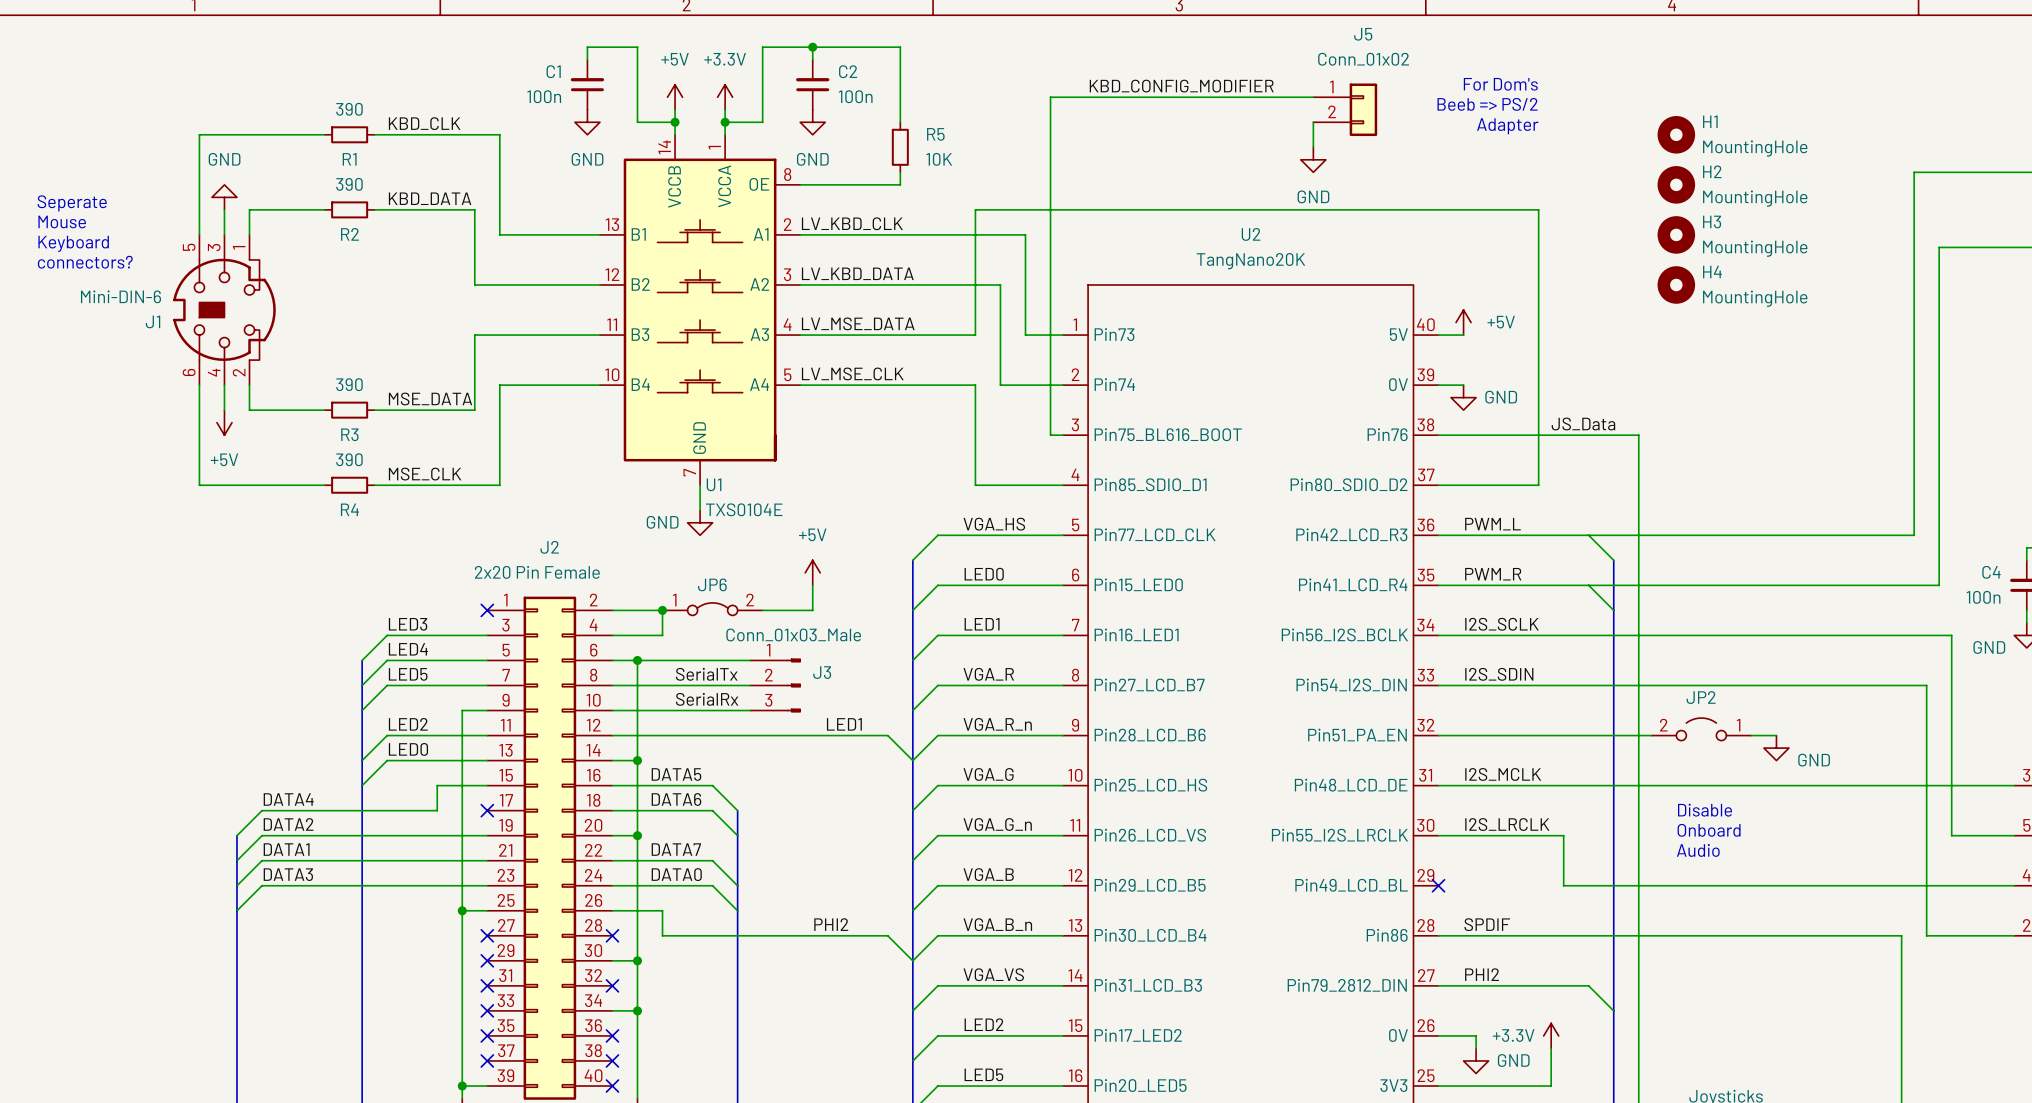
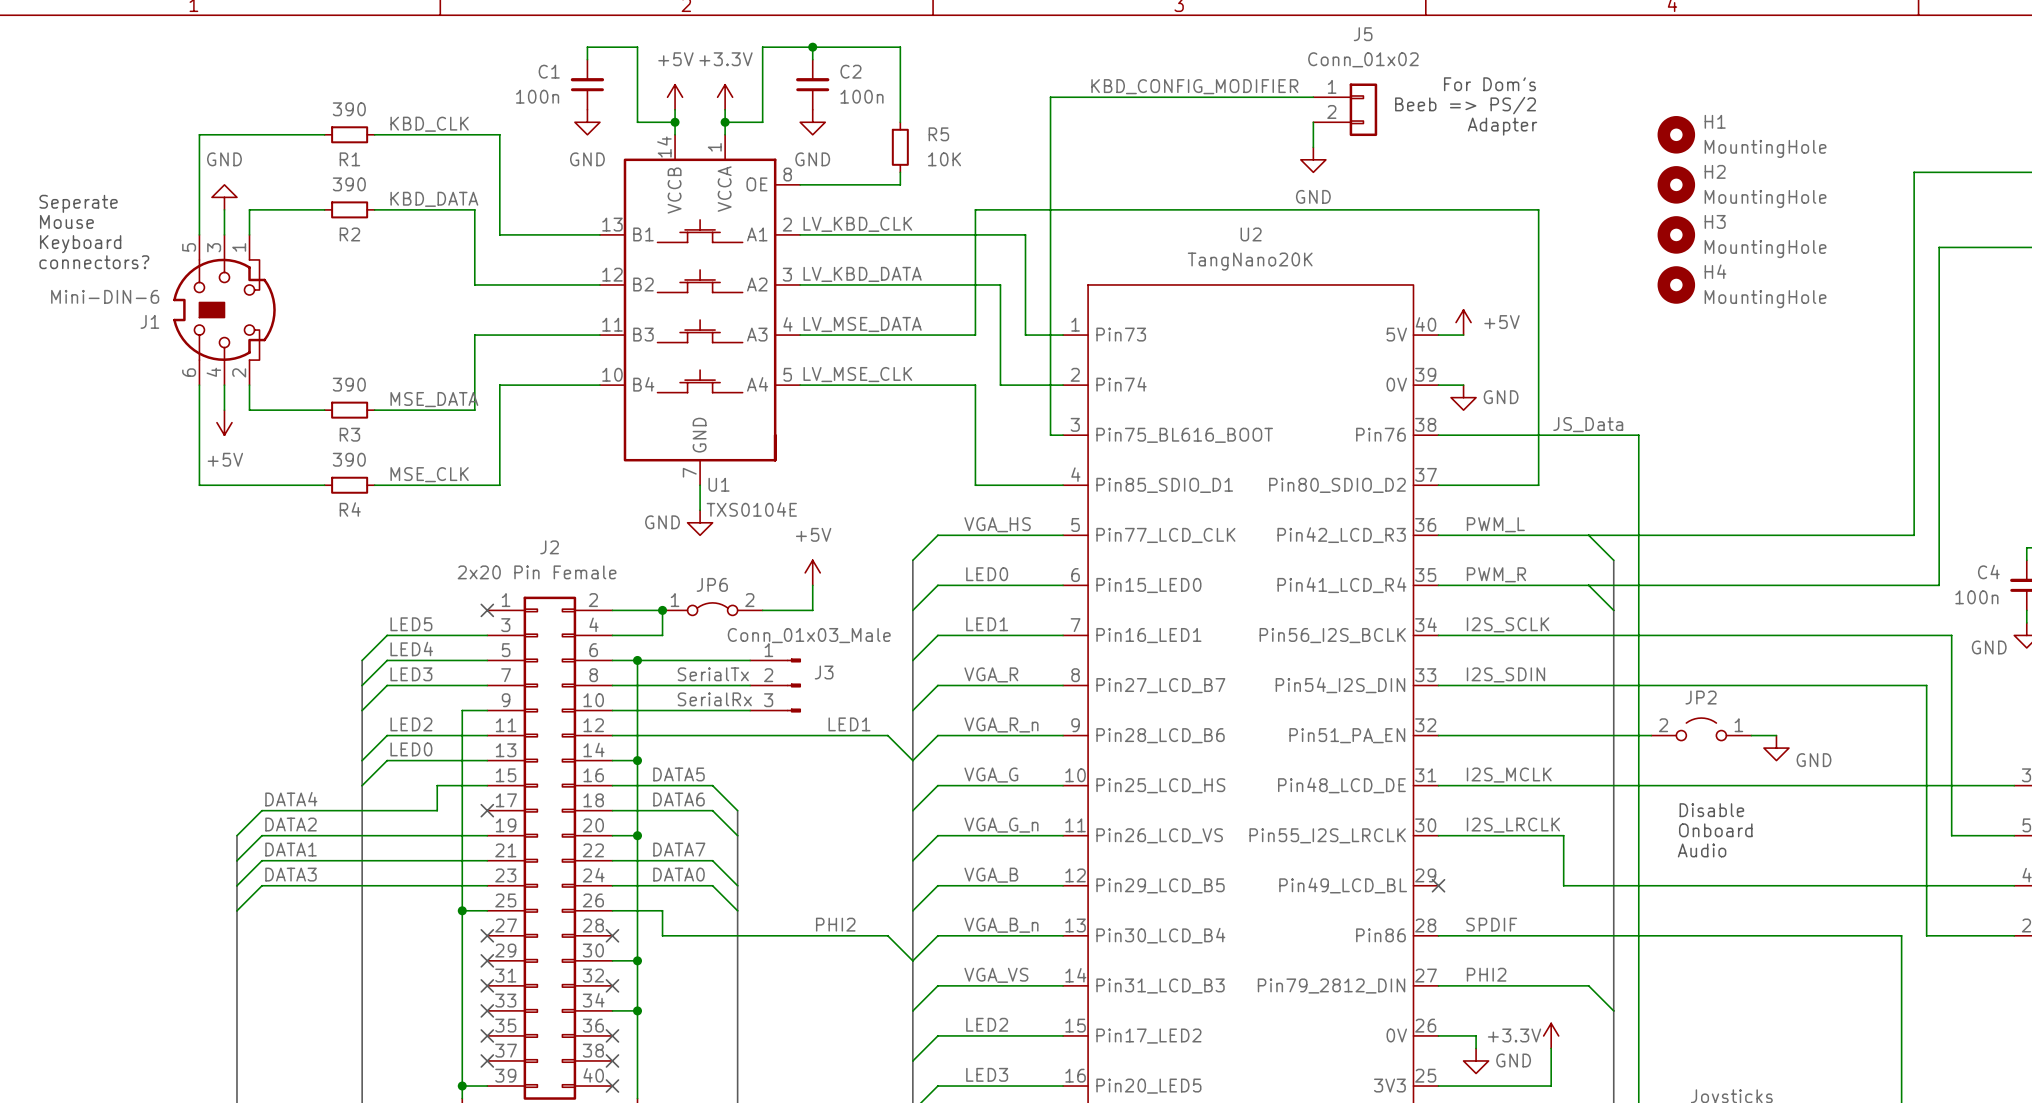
label: LED3 (408, 624) -> LED5 (411, 624)
label: LED5 (408, 674) -> LED3 (411, 674)
label: LED5 (983, 1074) -> LED3 (987, 1074)

